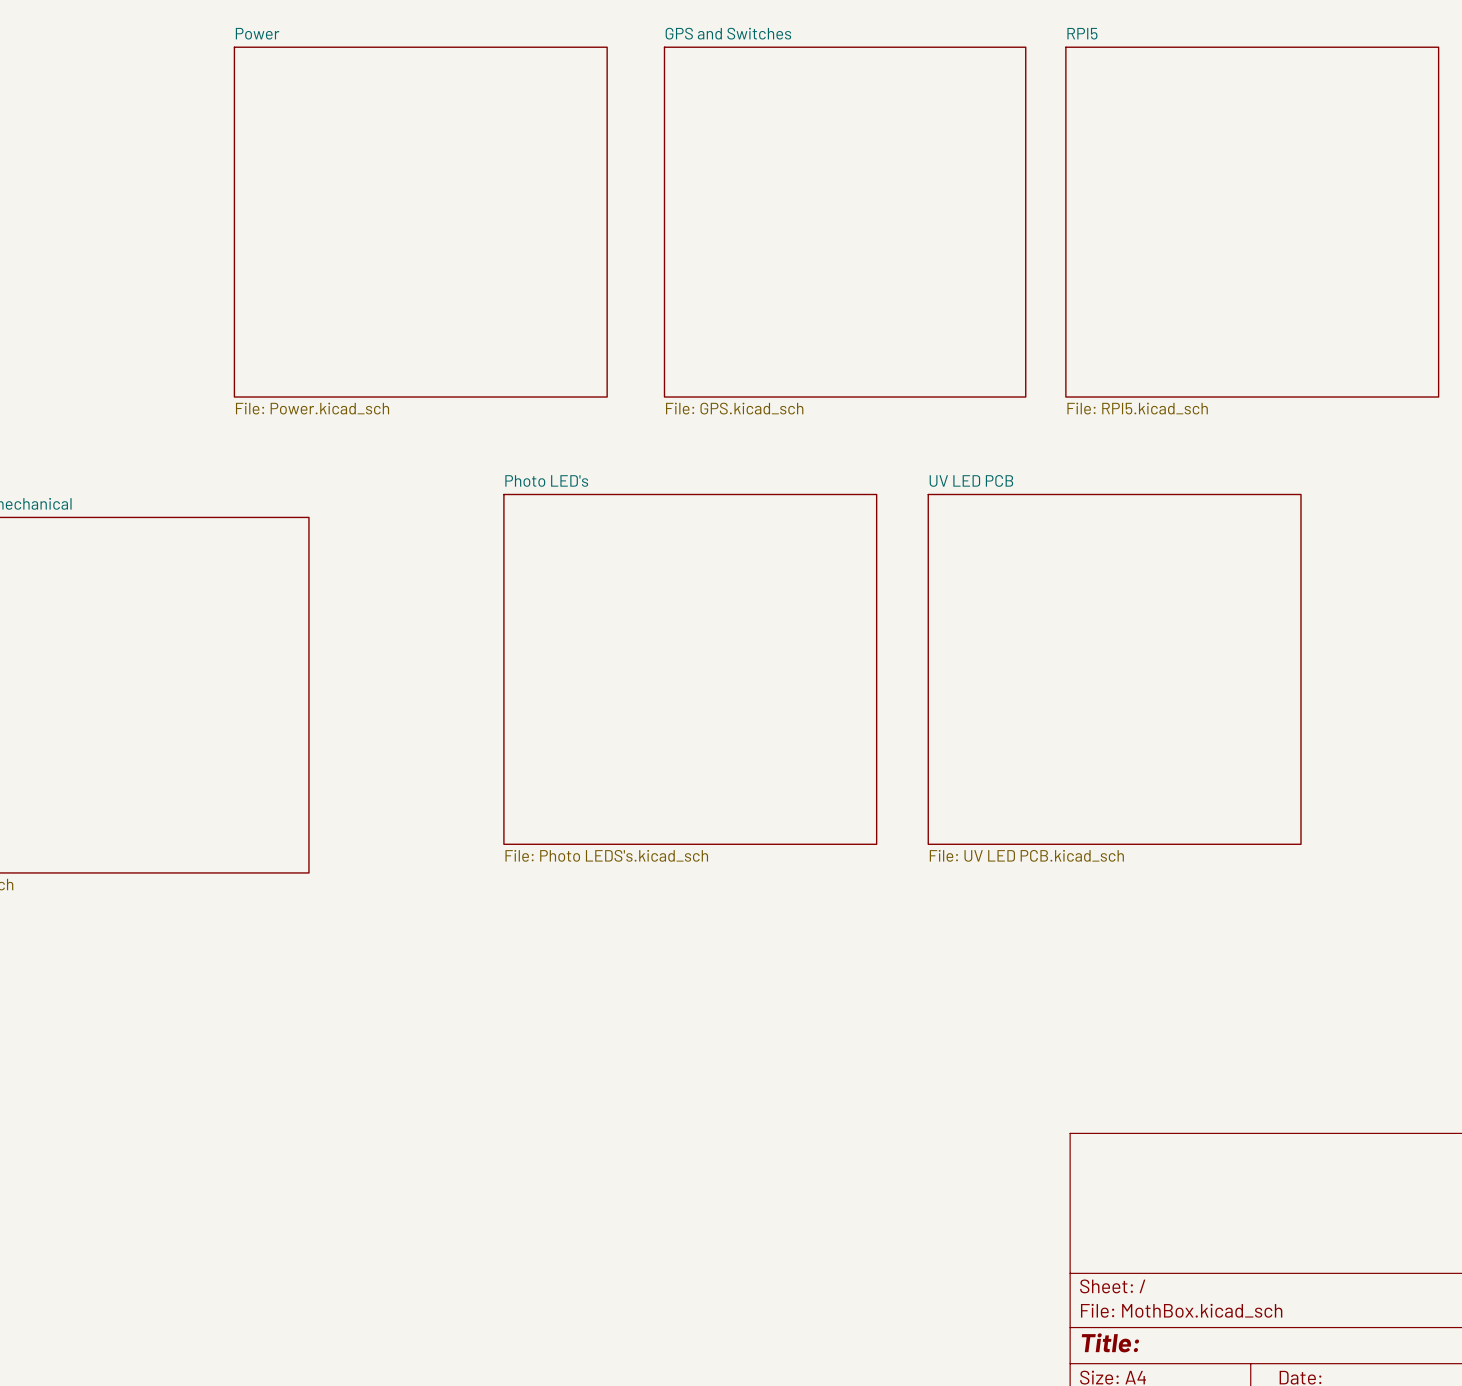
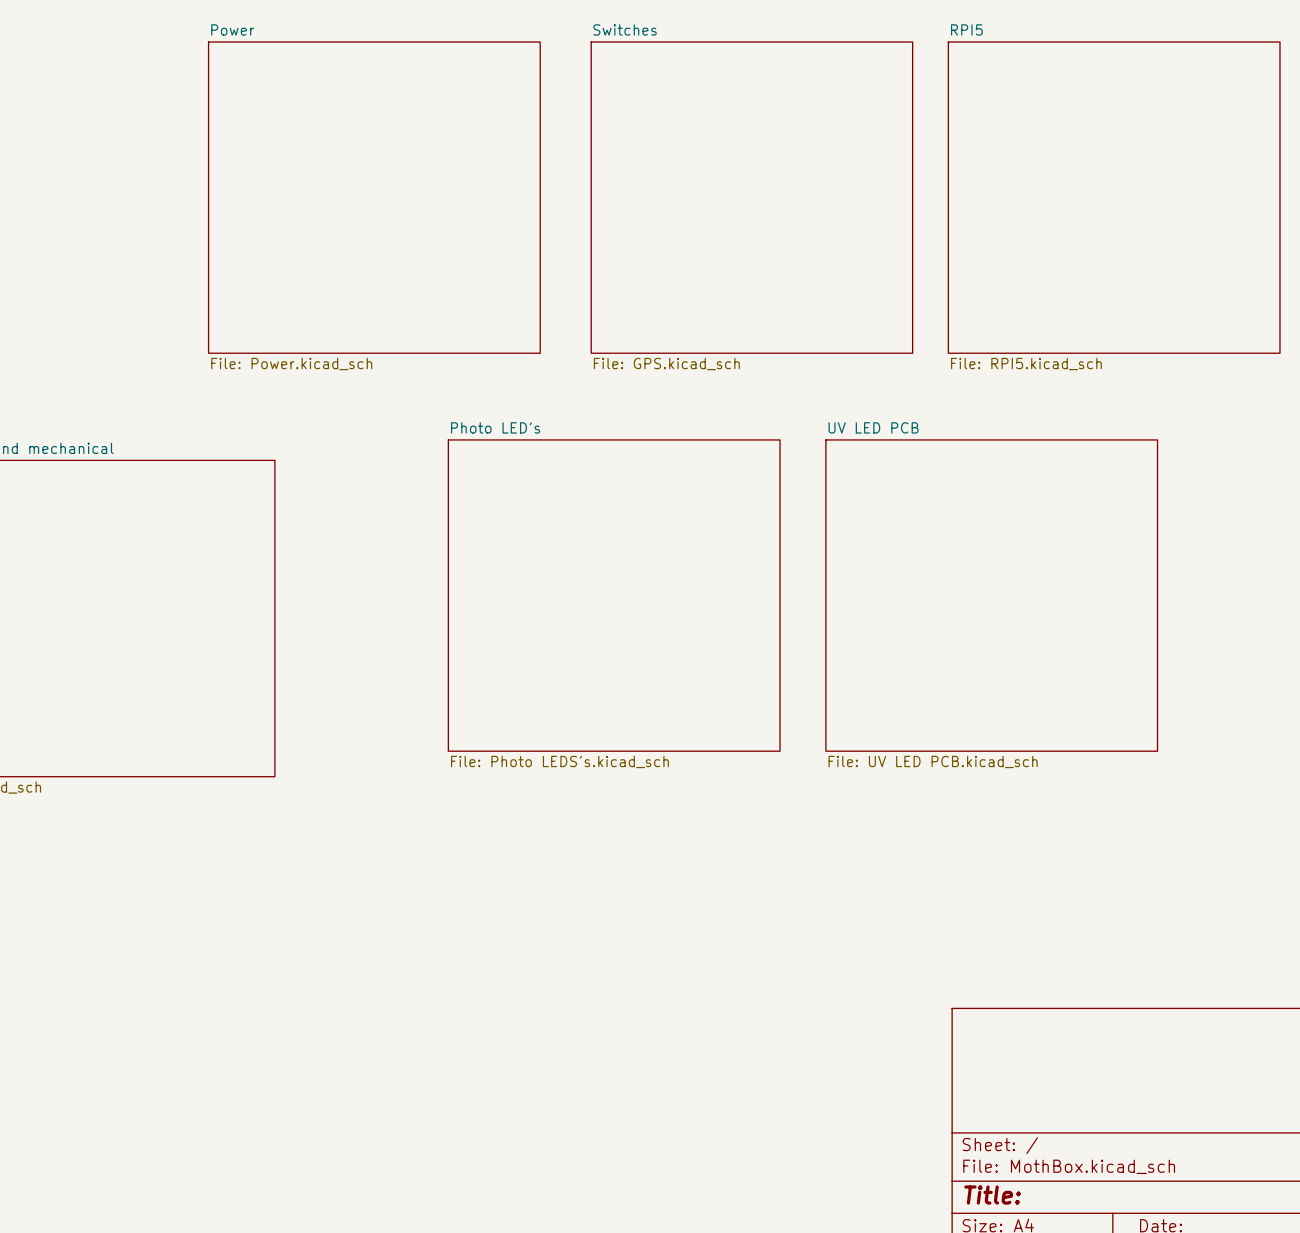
sheet GPS and Switches name: GPS and Switches (728, 33) -> Switches (625, 29)

